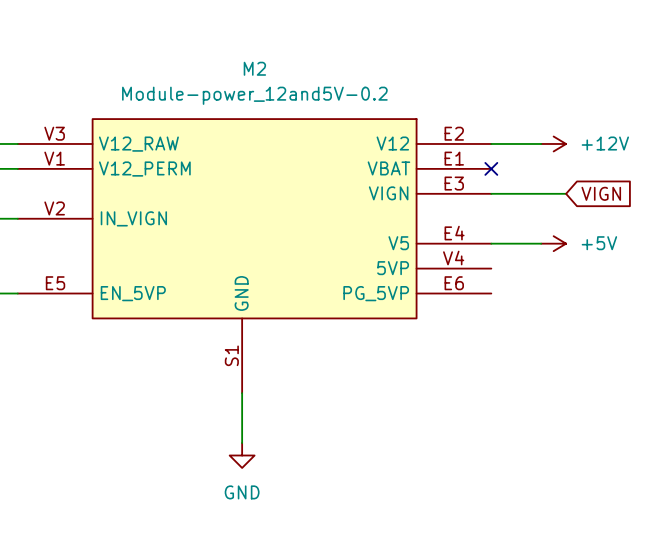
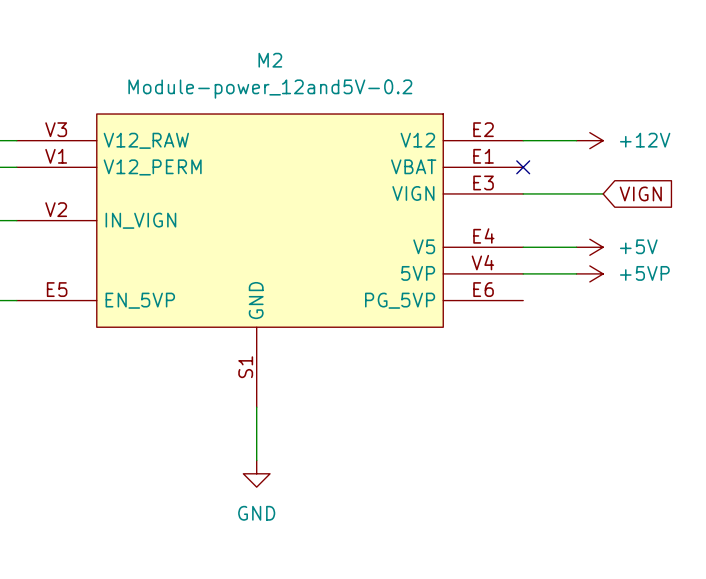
wire: none -> (523, 273) (576, 273)
power symbol: none -> +5VP (589, 273)

